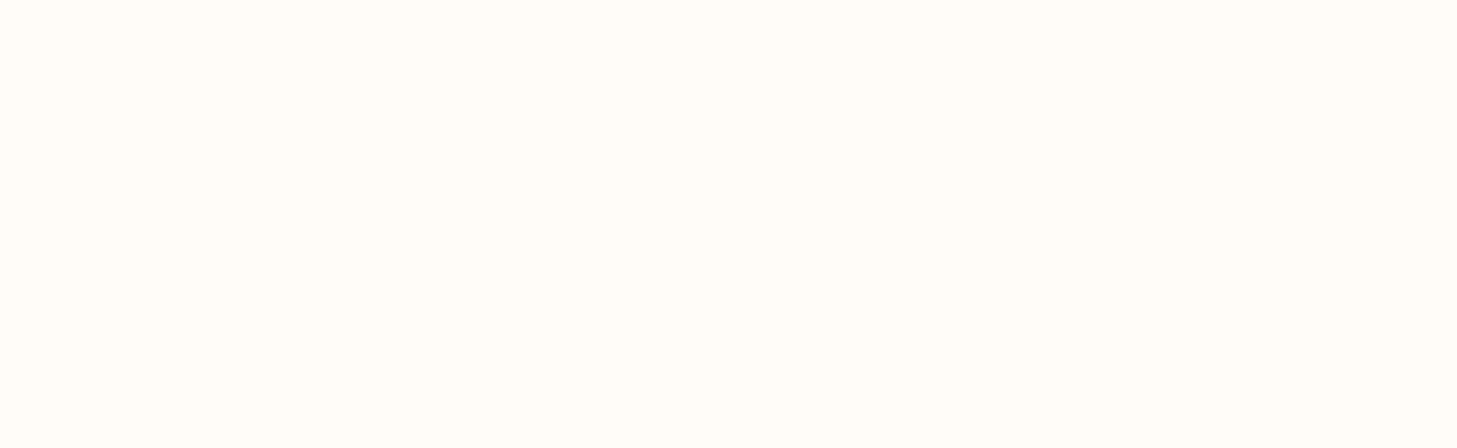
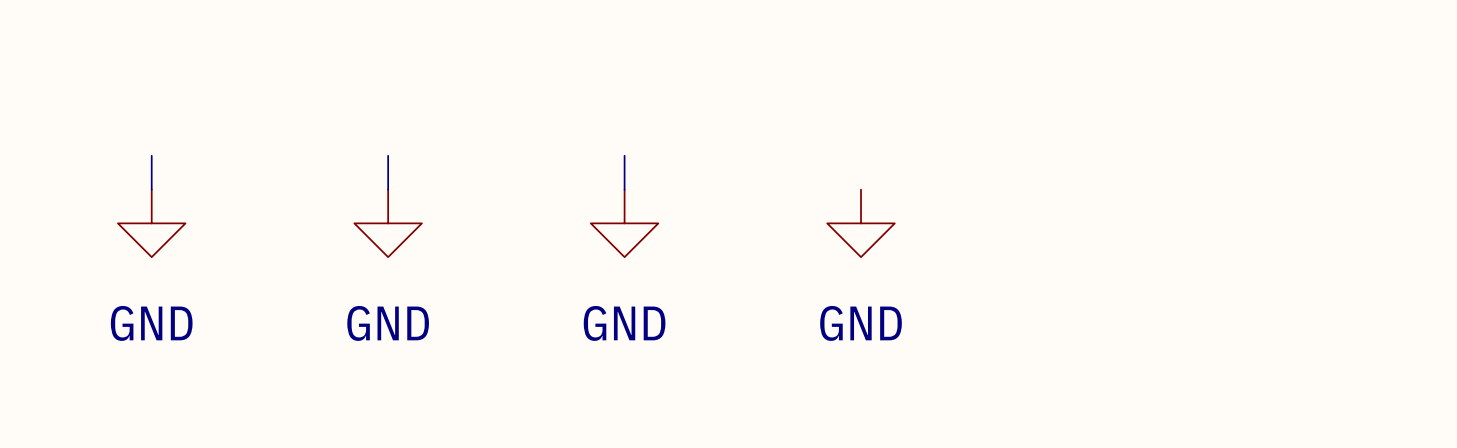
wire: none -> (151, 155) (151, 189)
wire: none -> (388, 155) (388, 189)
wire: none -> (624, 155) (624, 189)
power symbol: none -> GND (151, 223)
power symbol: none -> GND (388, 223)
power symbol: none -> GND (624, 223)
power symbol: none -> GND (861, 223)

